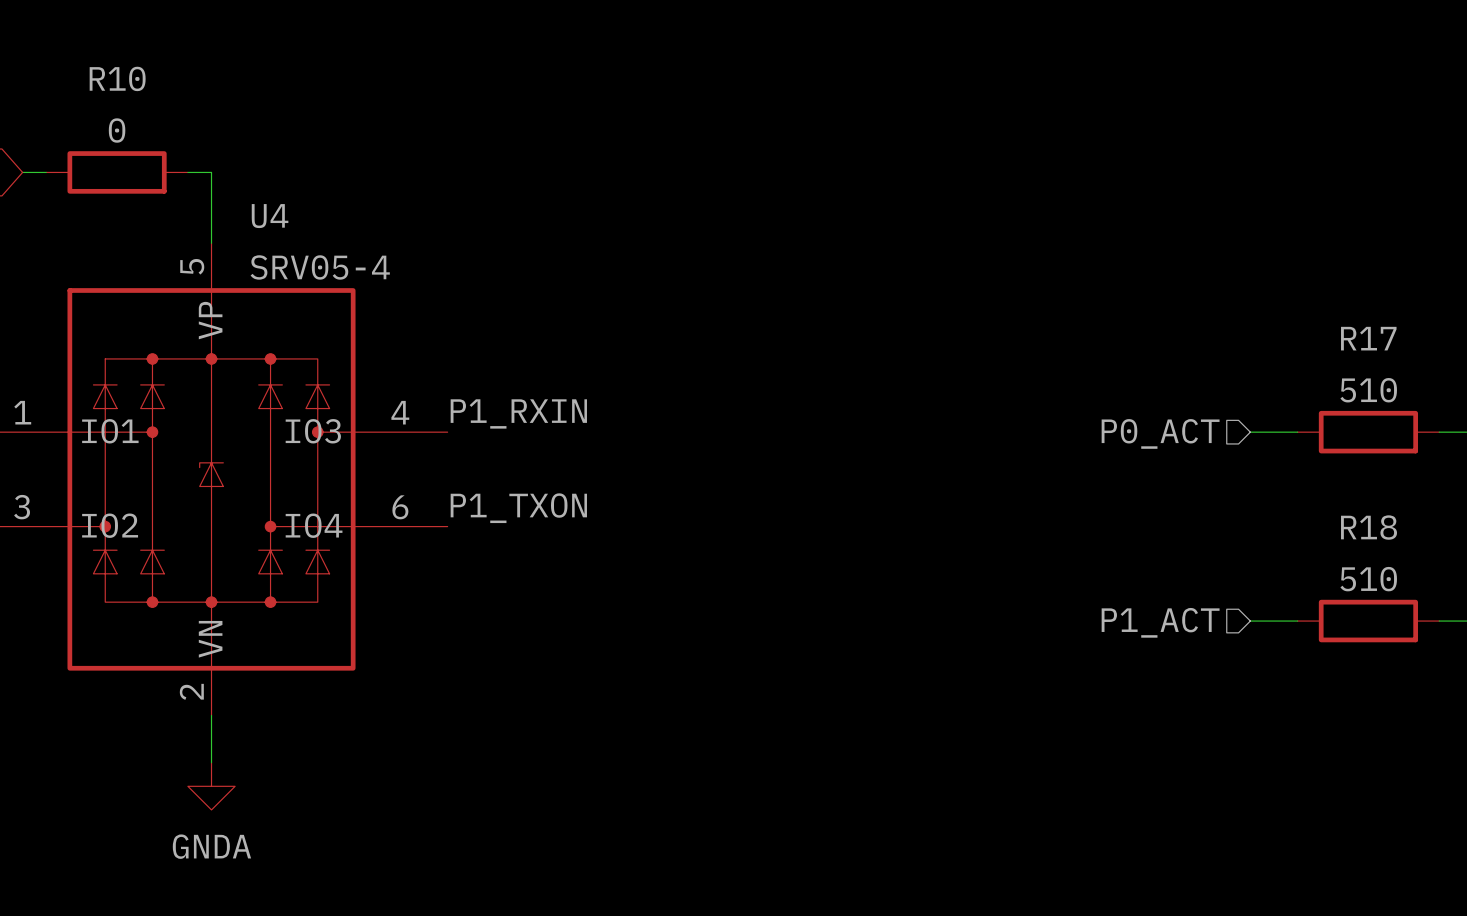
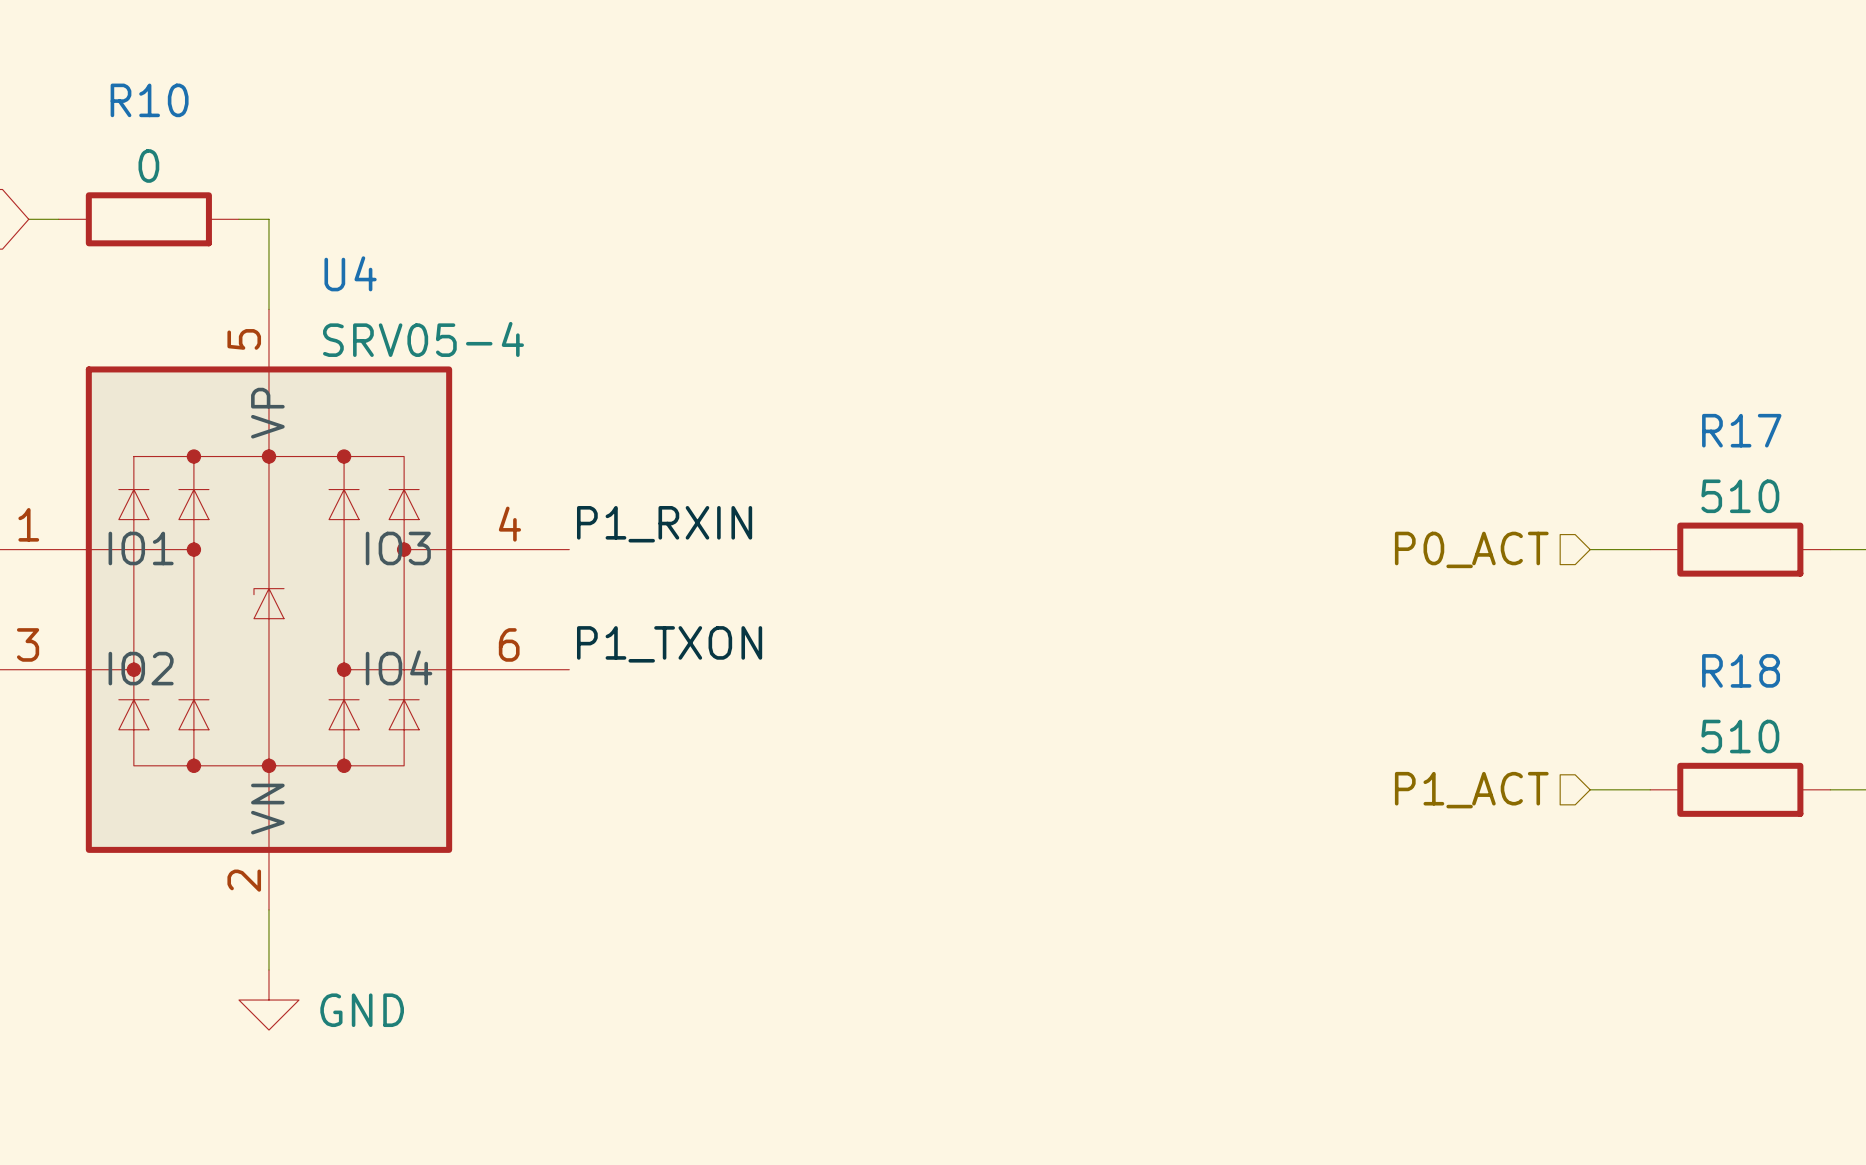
power symbol: GNDA (211, 786) -> GND (268, 1000)

